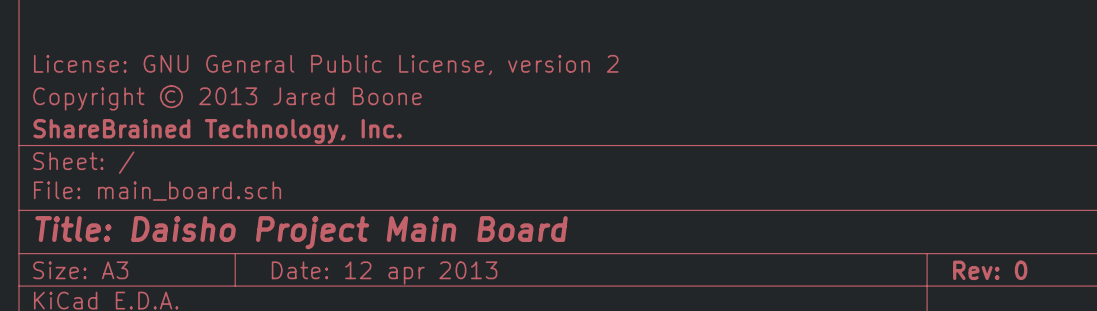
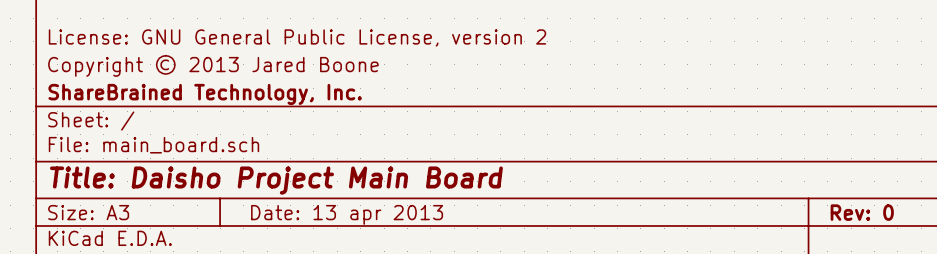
title block: Date: 12 apr 2013 (384, 273) -> Date: 13 apr 2013 (347, 214)

